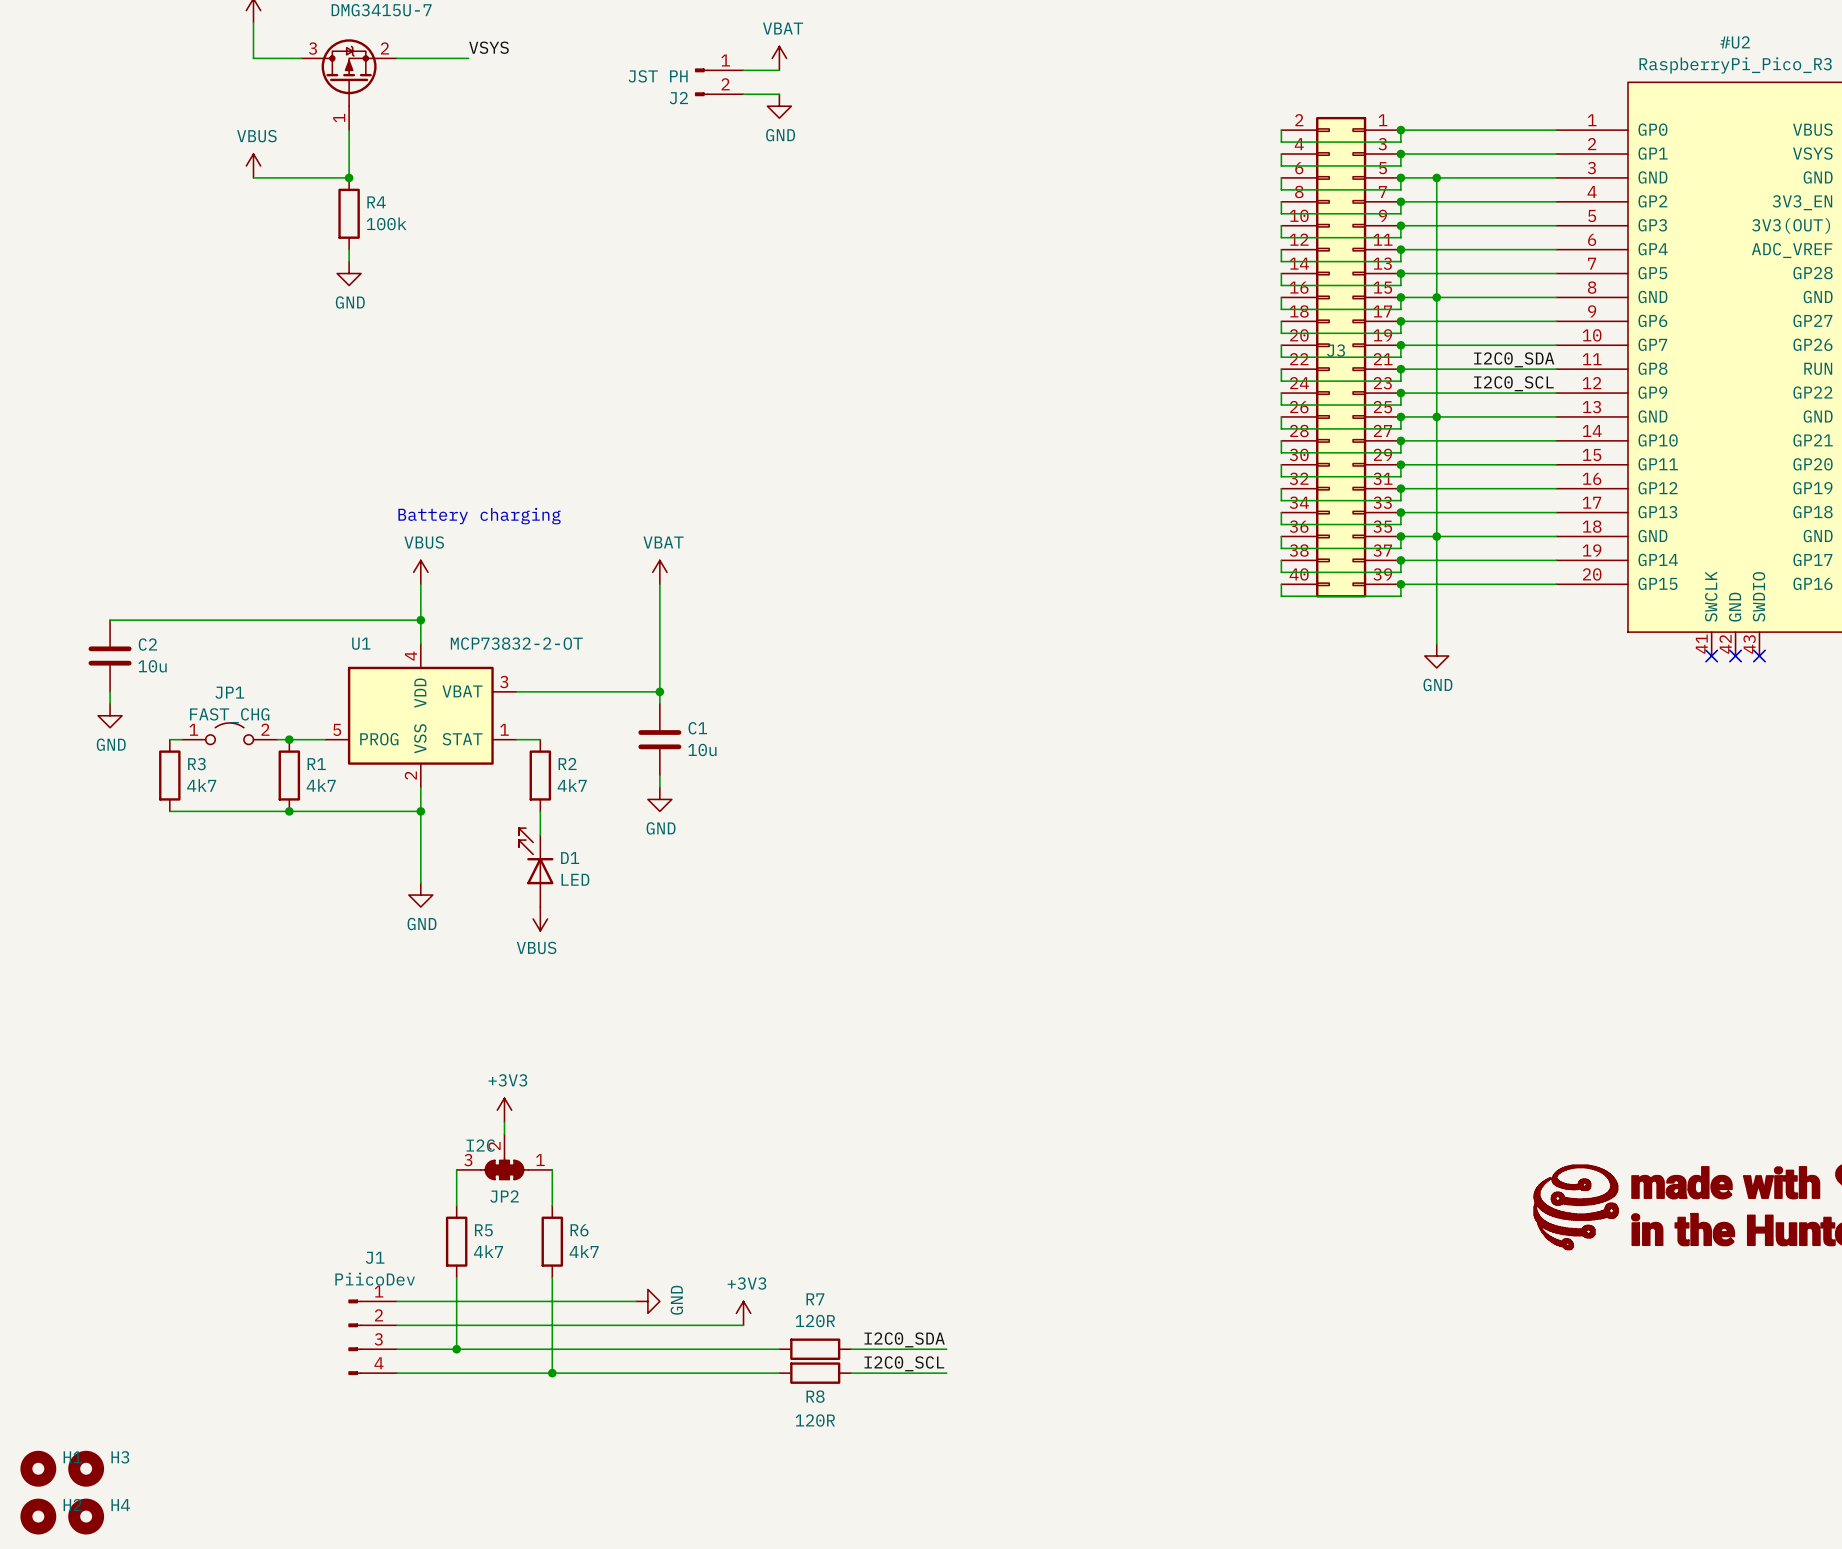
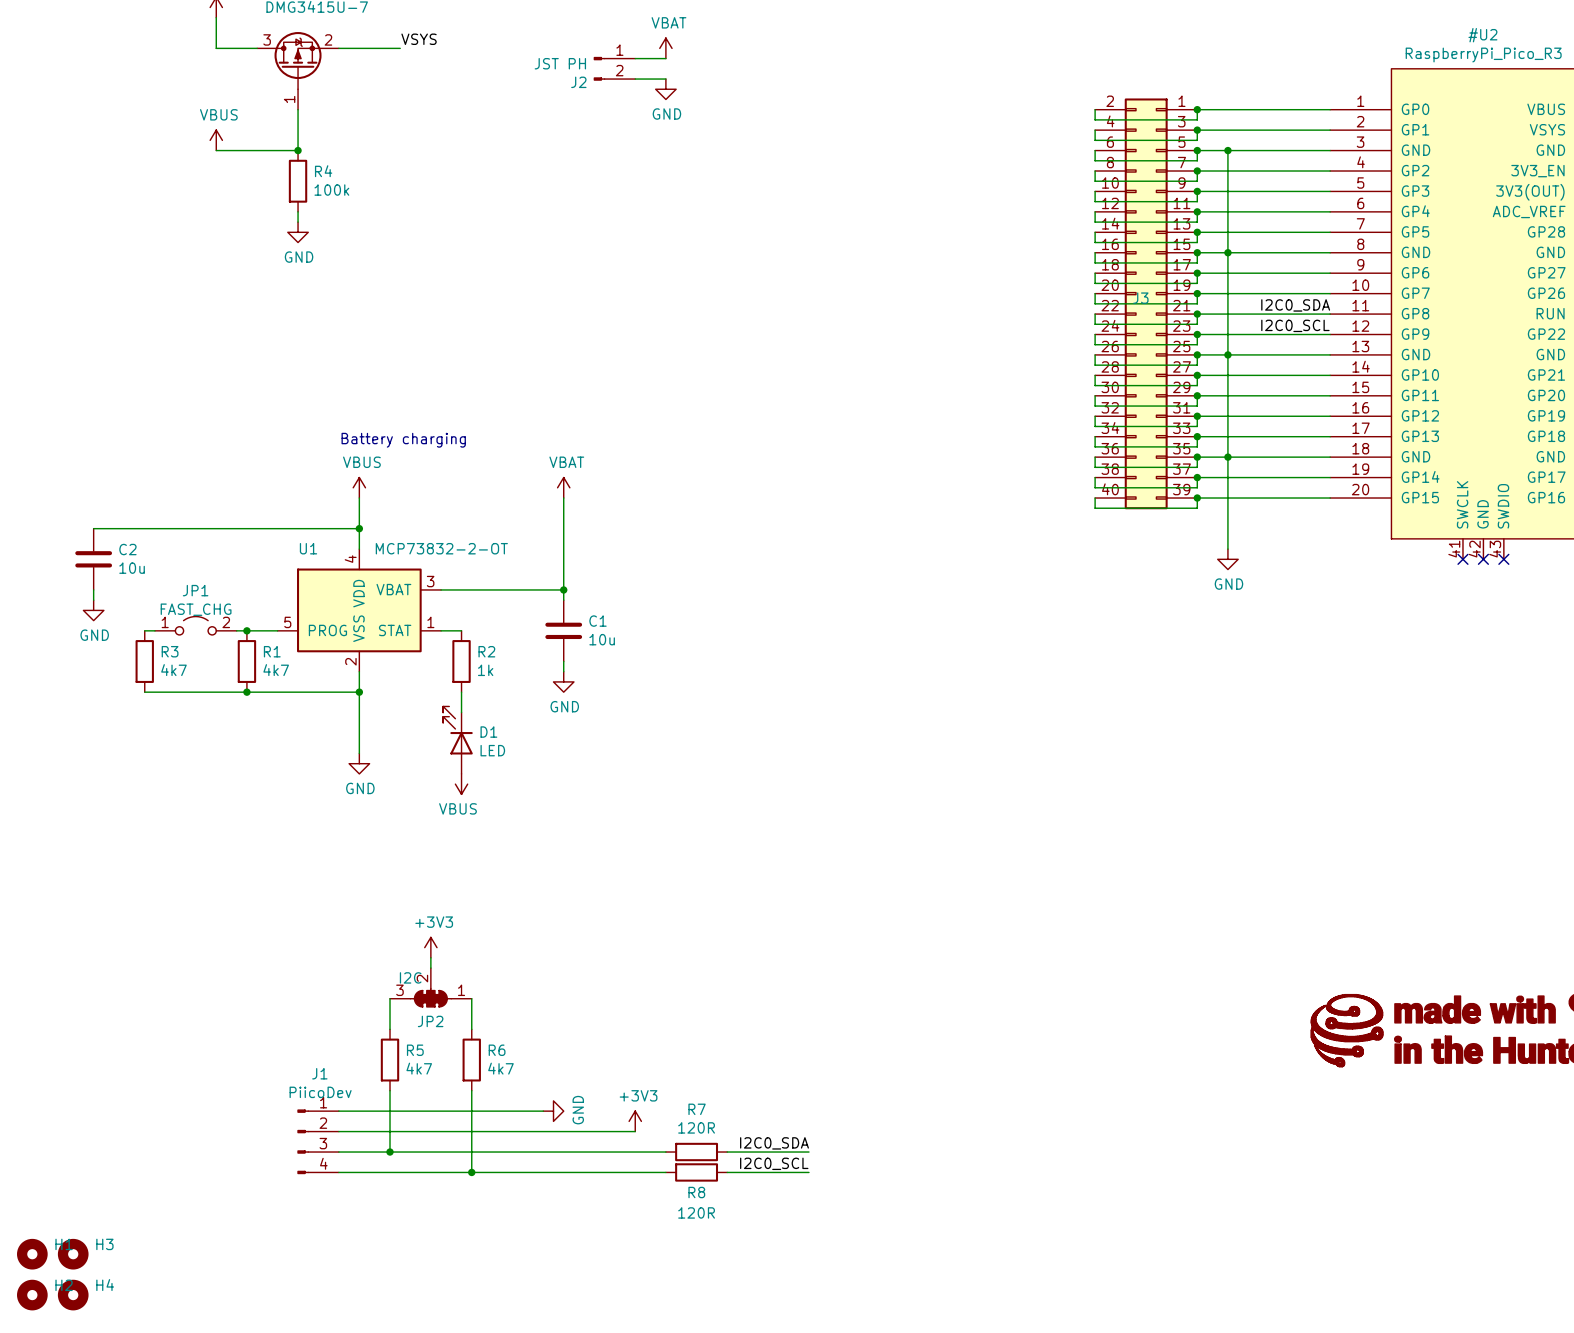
R2 value: 4k7 (572, 785) -> 1k (485, 670)

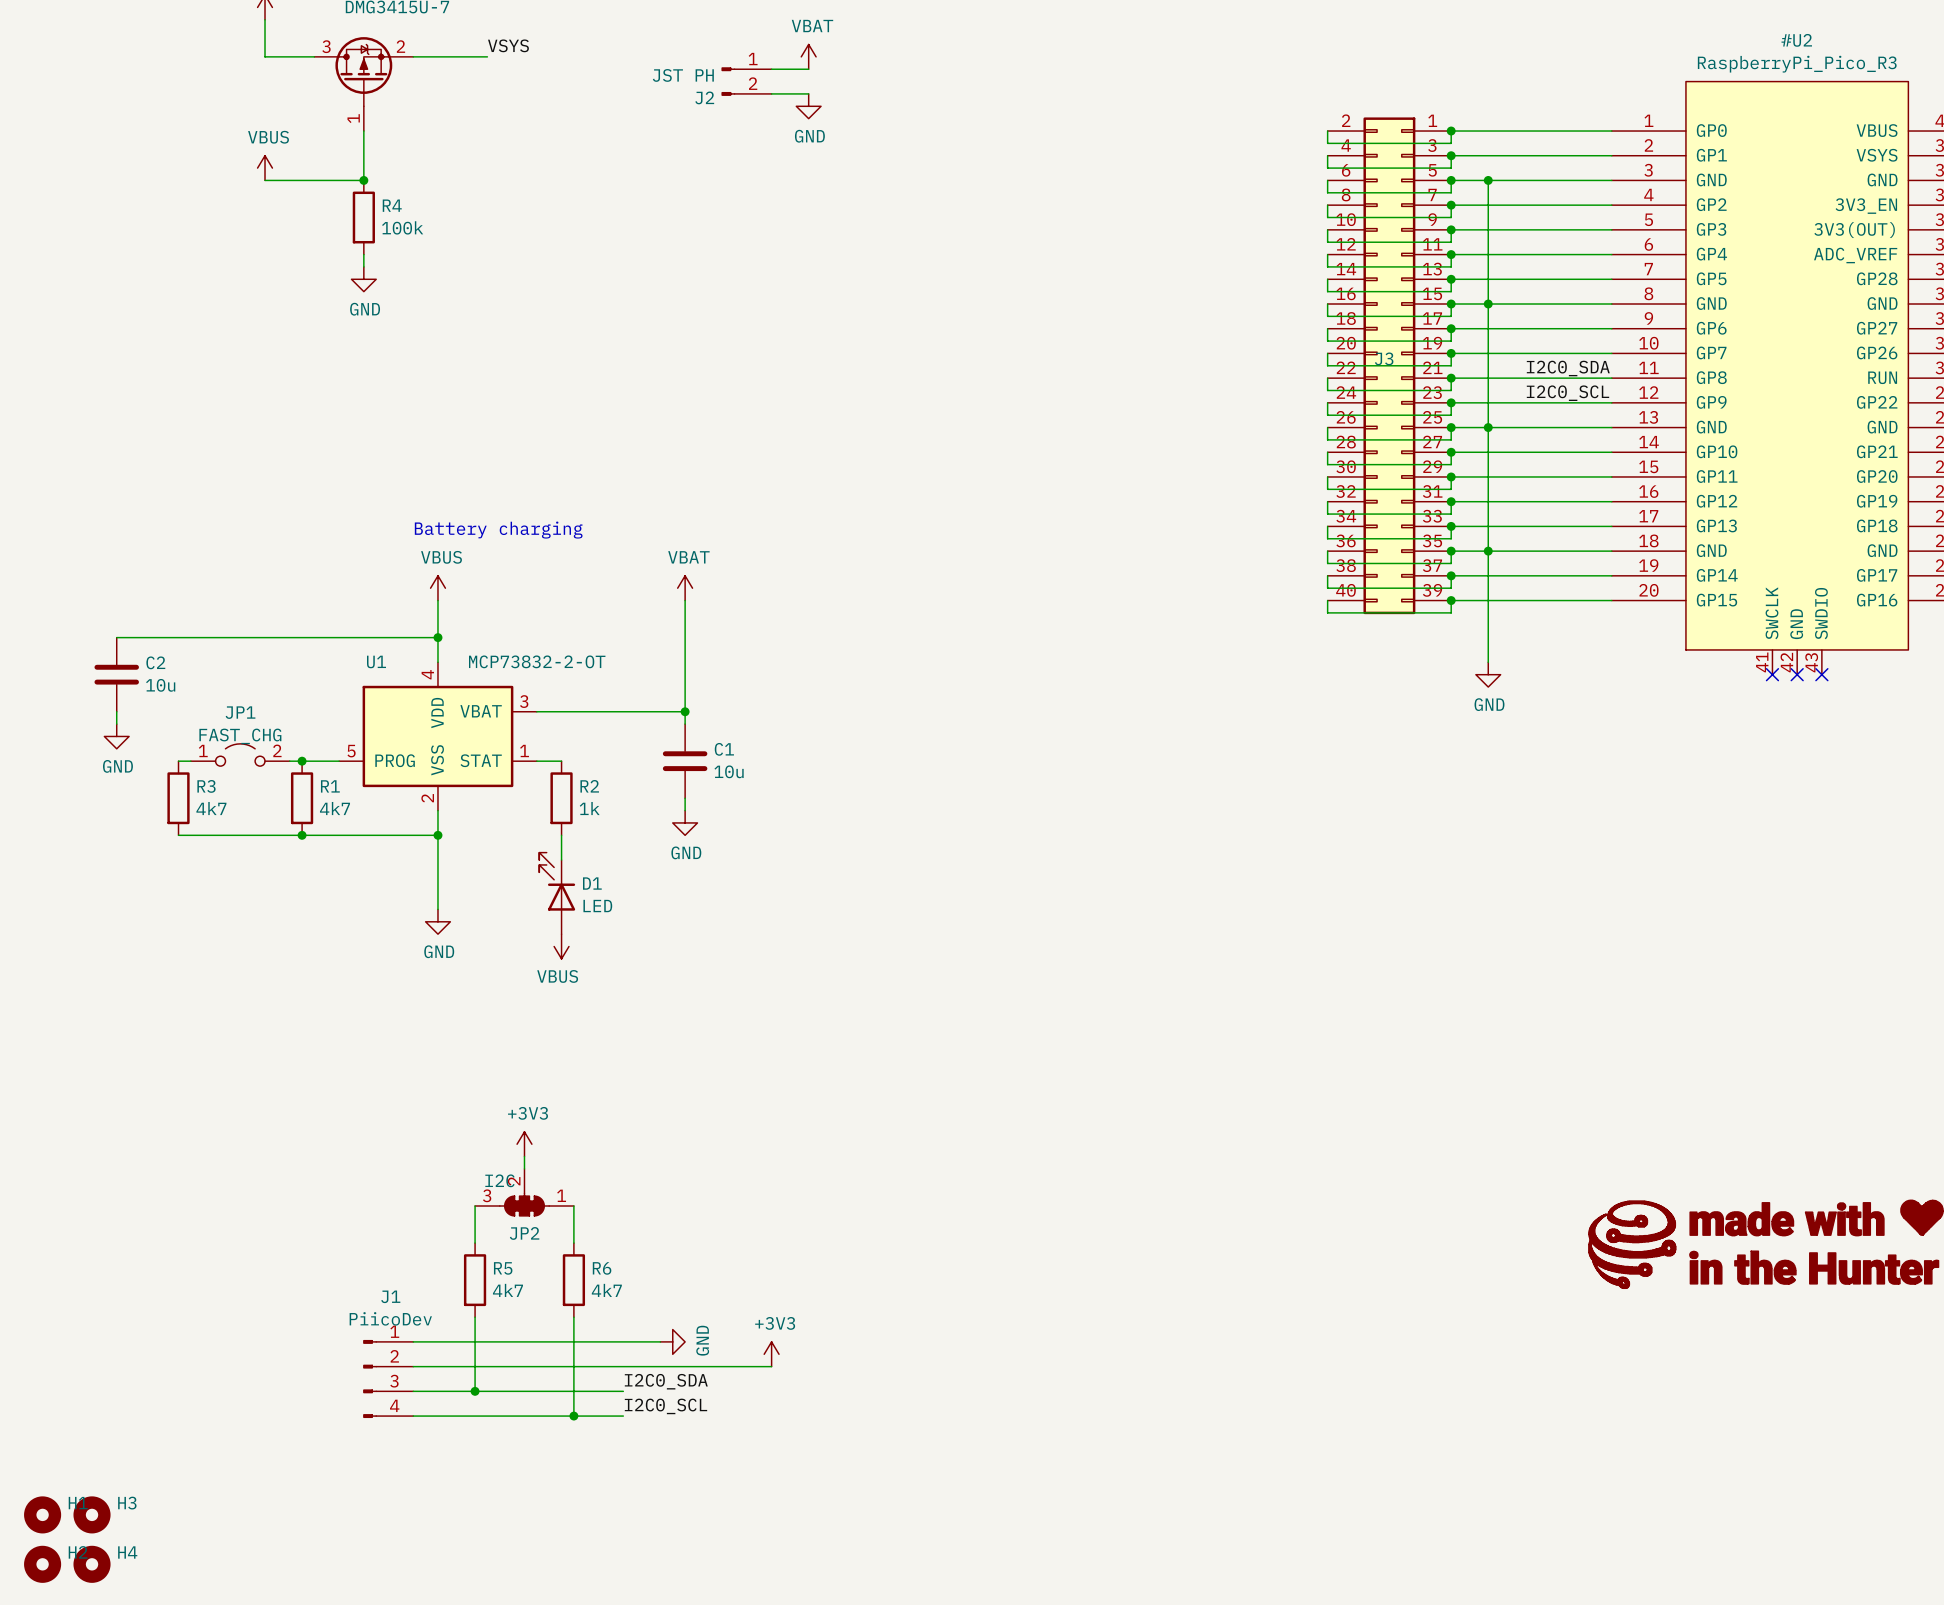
label: none -> I2C0_SDA (666, 1381)
label: I2C0_SDA (774, 1143) -> none
wire: (512, 1152) (665, 1152) -> none
R7: 120R (696, 1152) -> none
wire: (727, 1152) (808, 1152) -> none
label: none -> I2C0_SCL (665, 1406)
label: I2C0_SCL (774, 1163) -> none
wire: (512, 1172) (665, 1172) -> none
R8: 120R (696, 1172) -> none
wire: (727, 1172) (808, 1172) -> none

